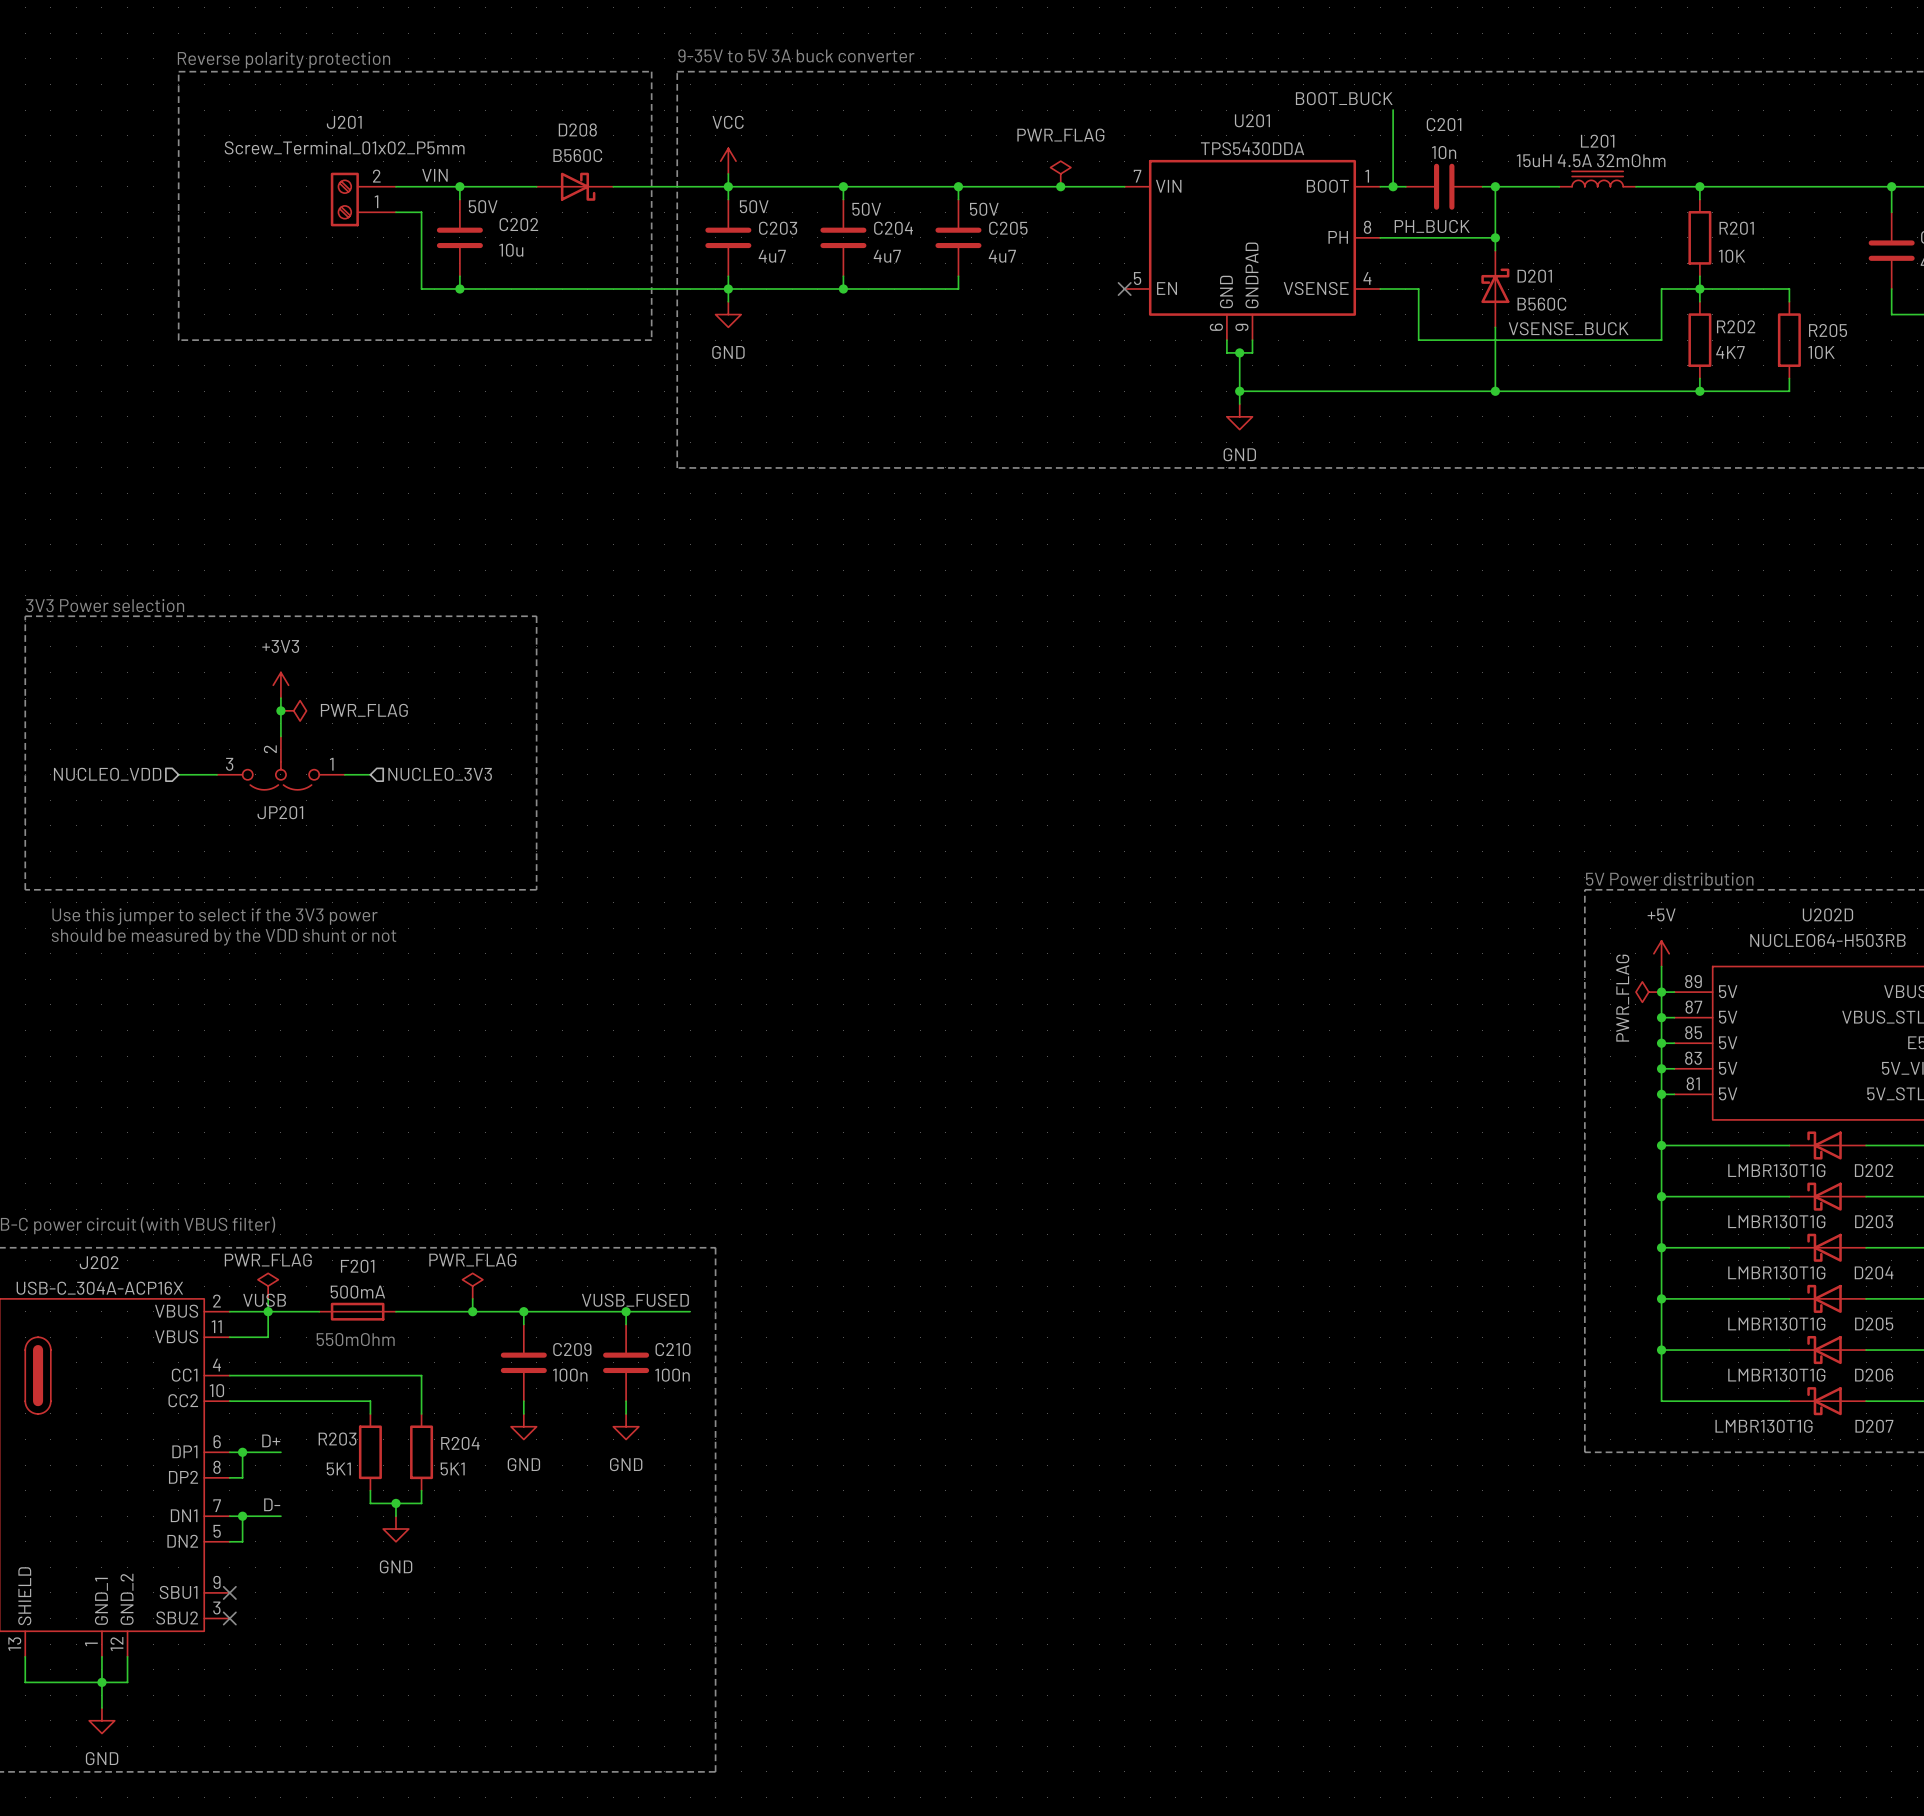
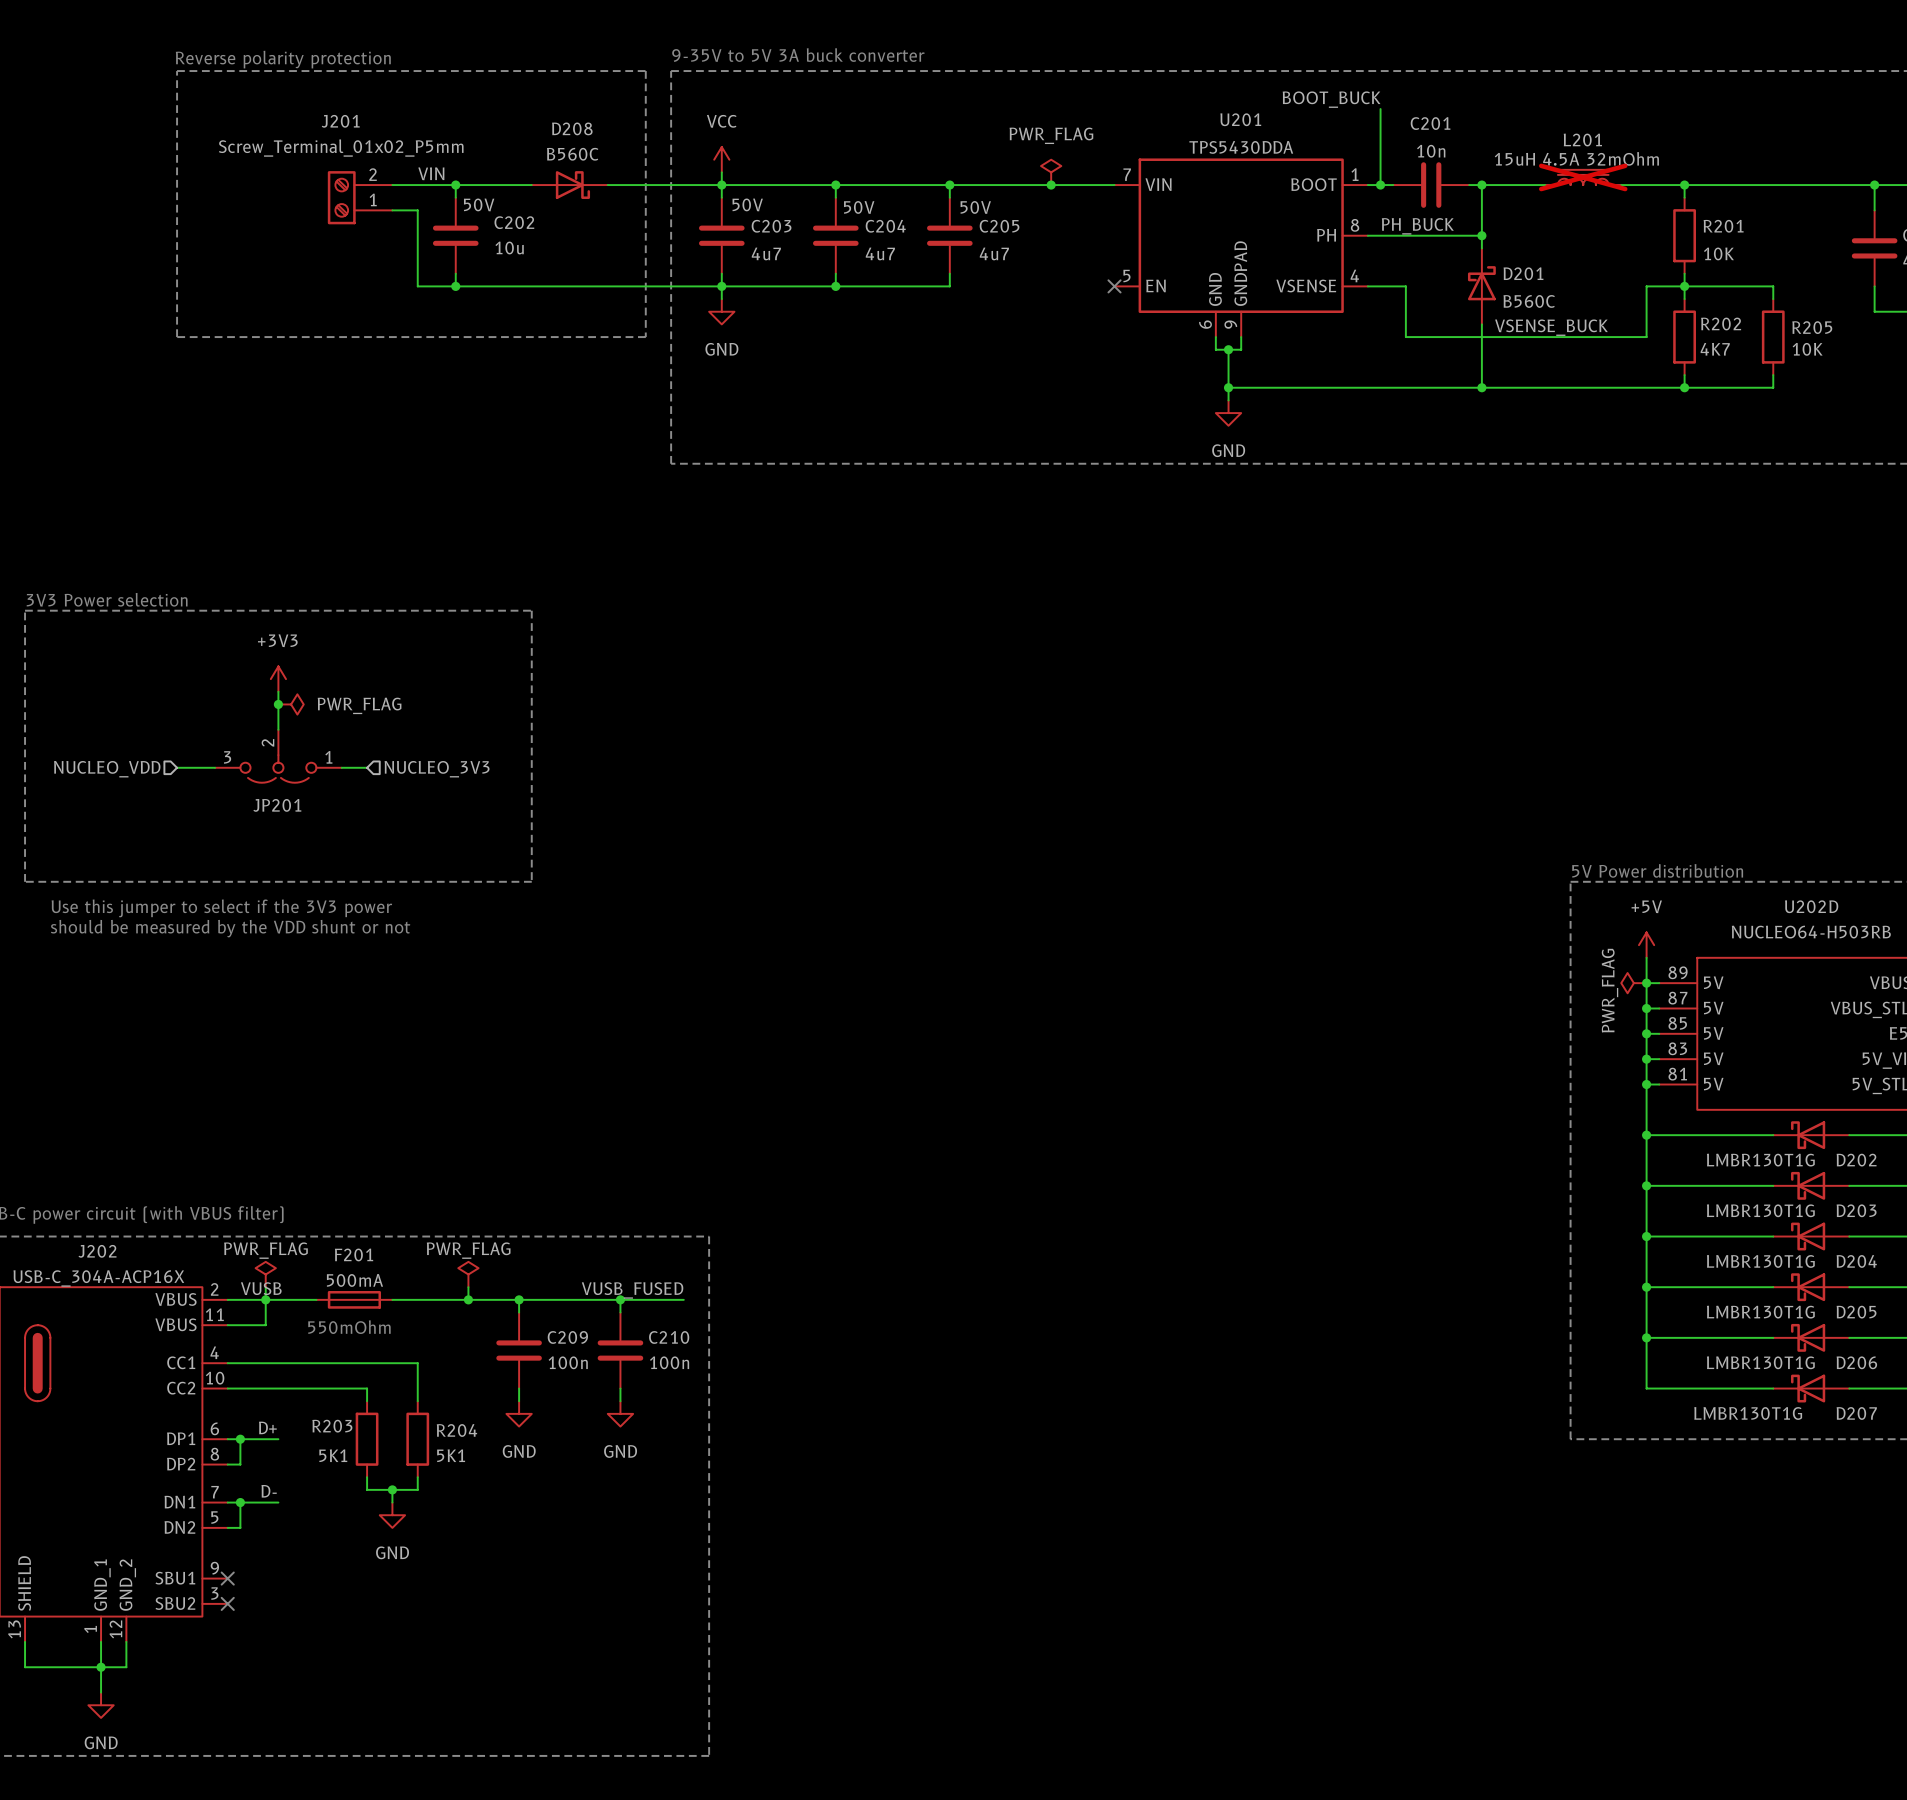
L201 do-not-place cross: none -> (1583, 177)

